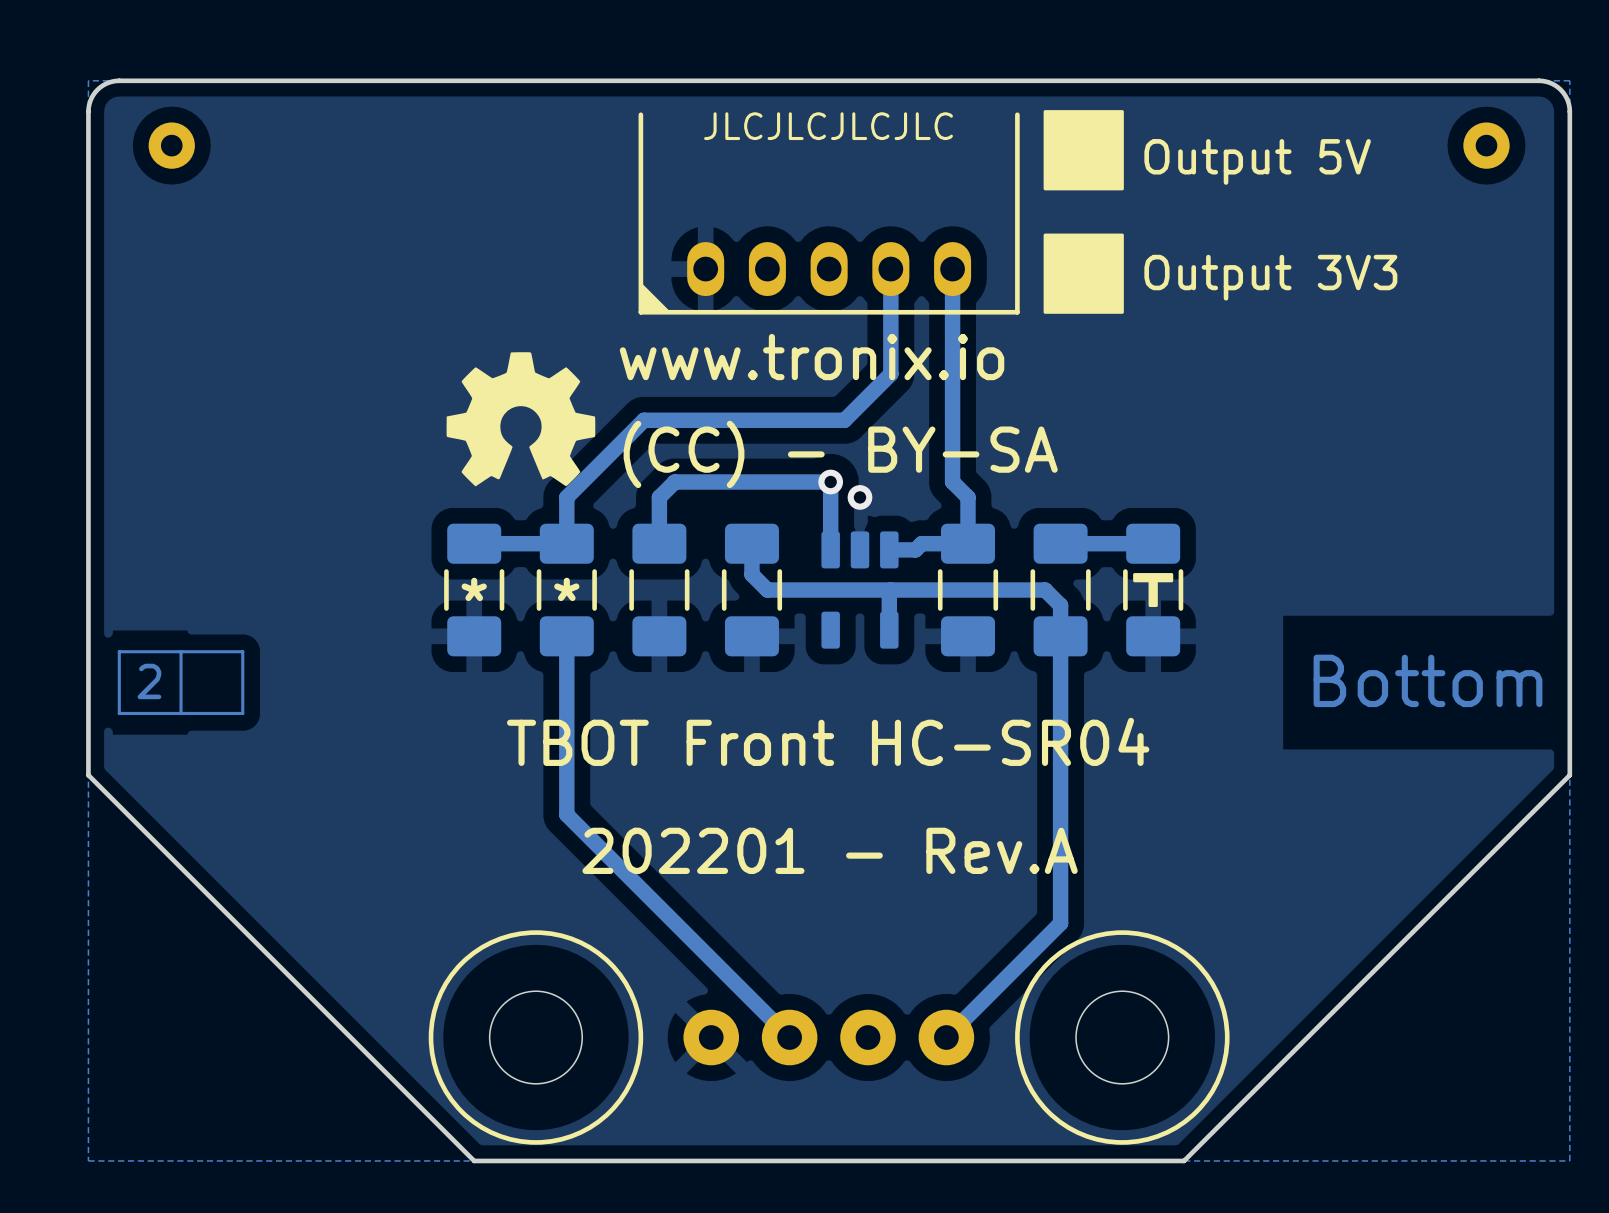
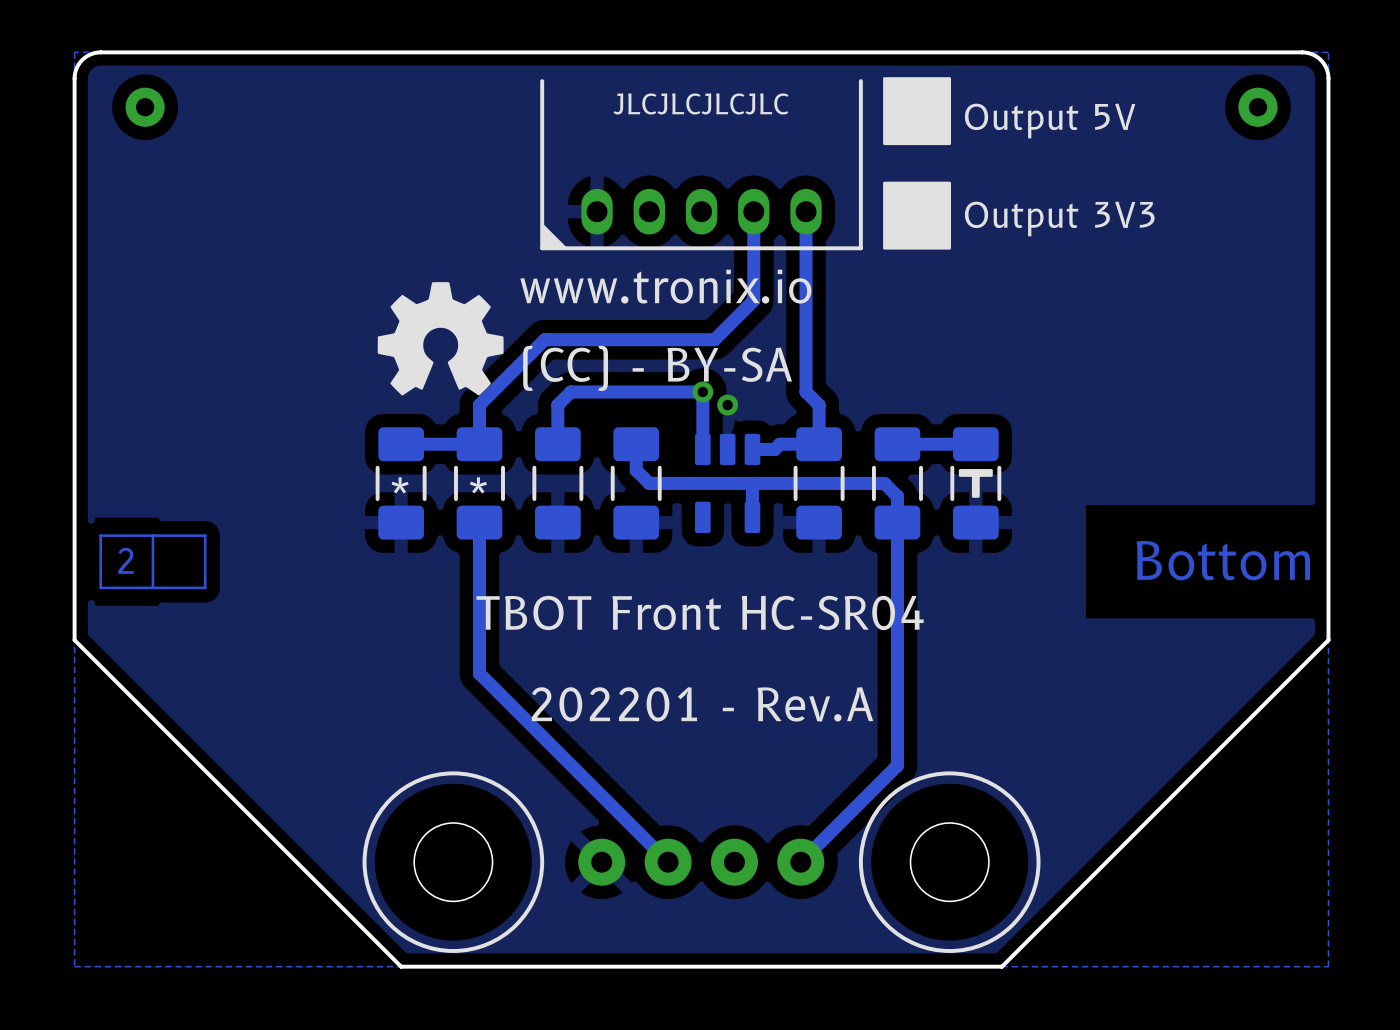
text position: JLCJLCJLCJLC (828, 126) -> JLCJLCJLCJLC (701, 103)

